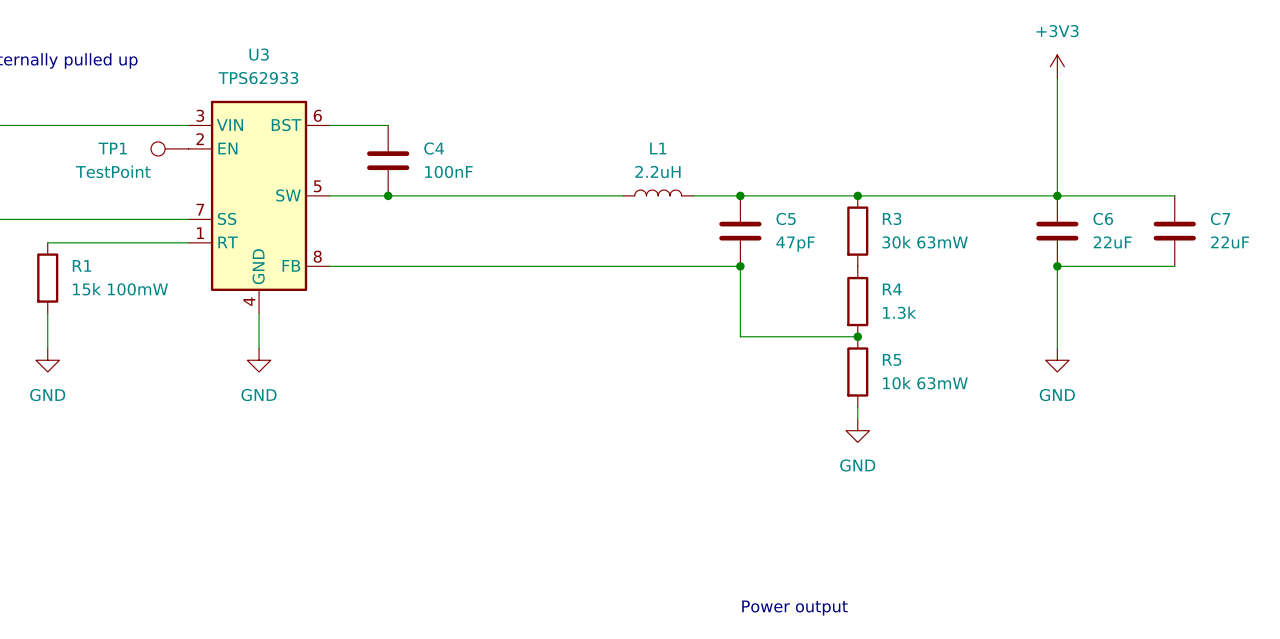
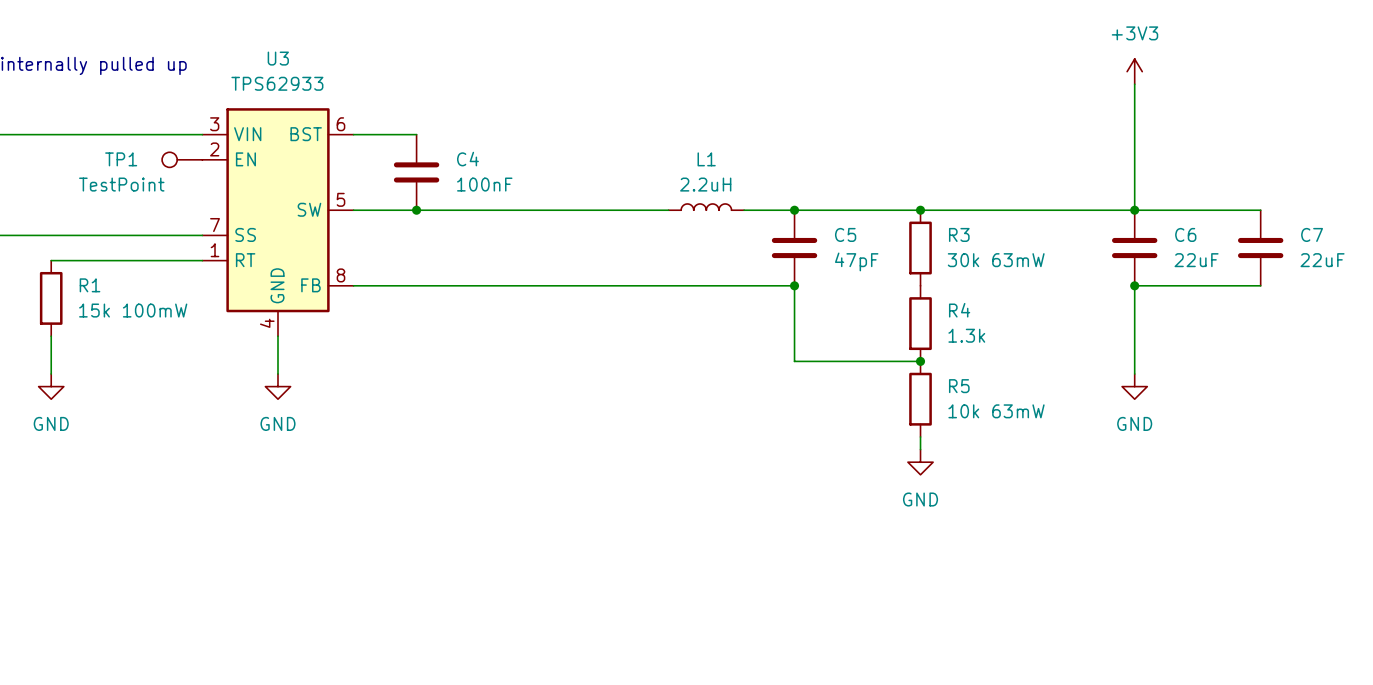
text: Power output (794, 608) -> none

